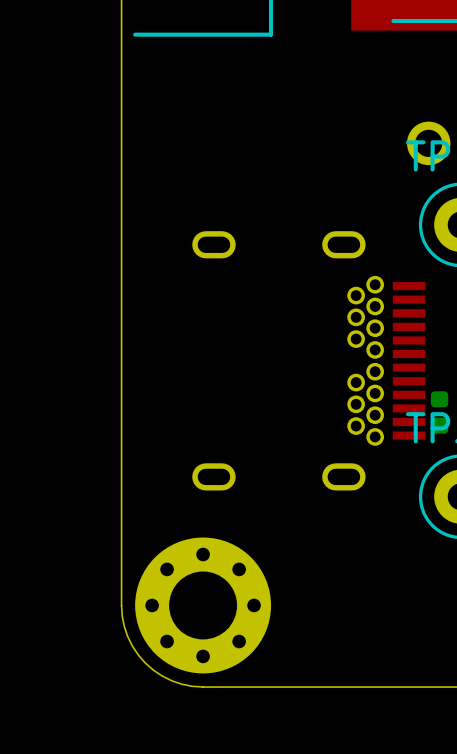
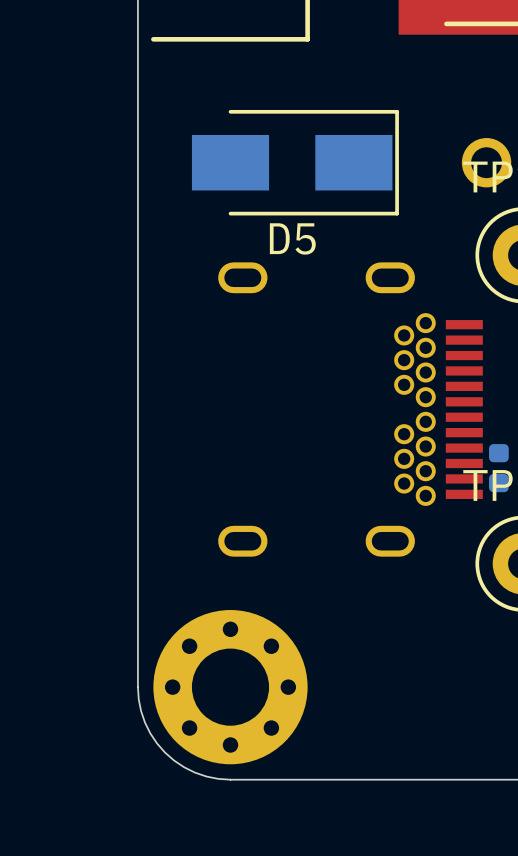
D5: none -> (295, 162)

